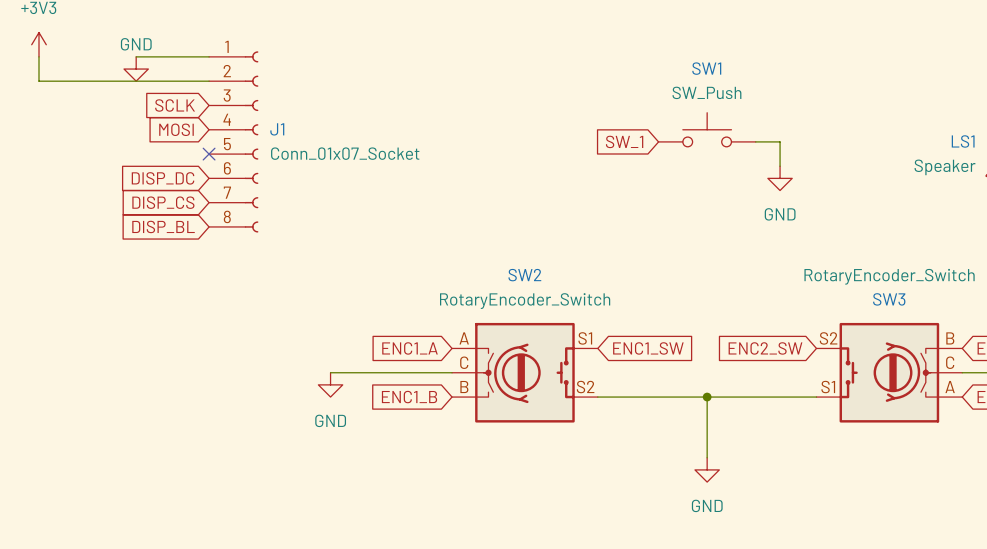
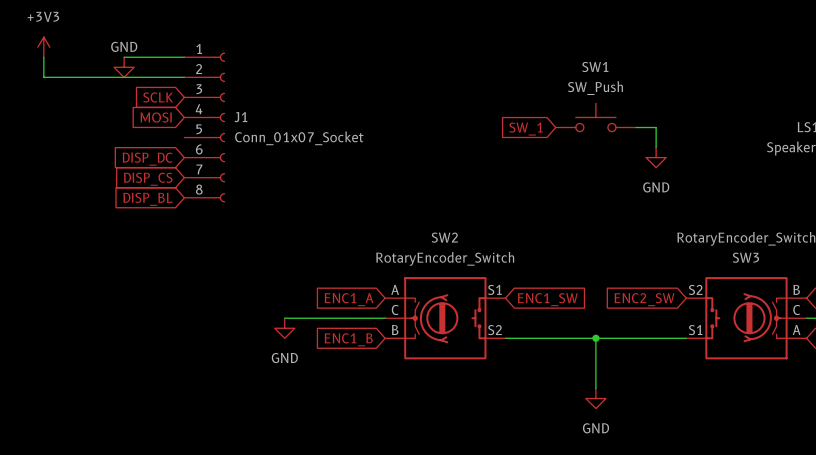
no-connect mark: (209, 154) -> none

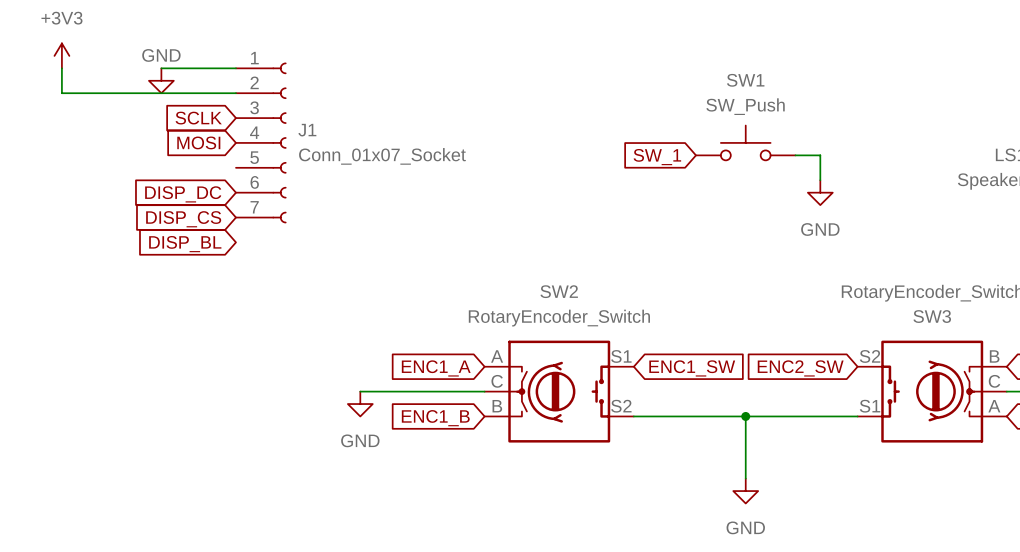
J1 symbol: [184, 52, 226, 203] -> [235, 62, 287, 224]

